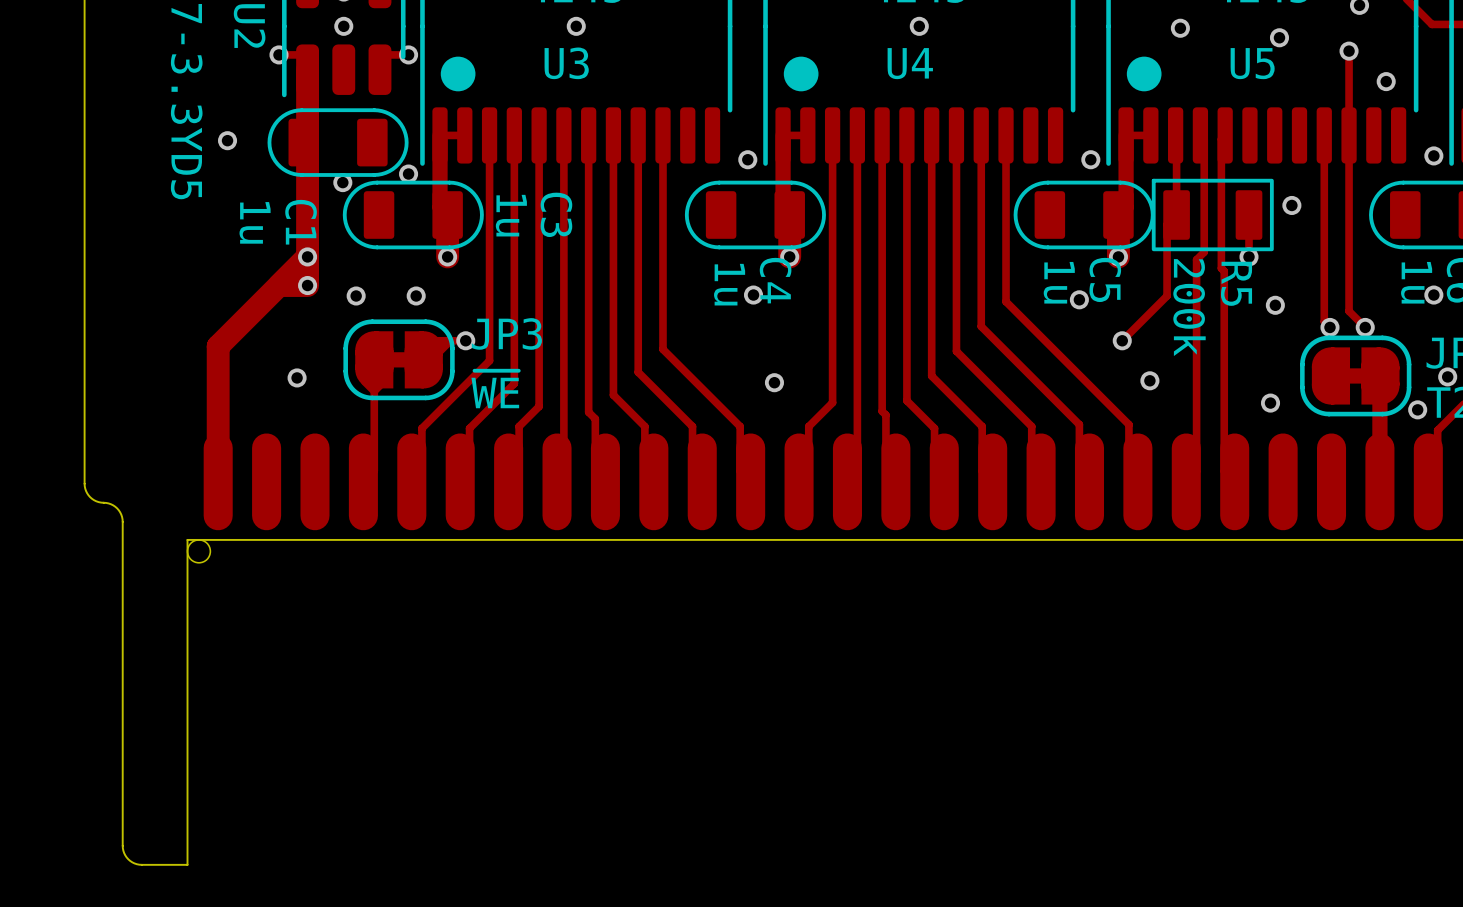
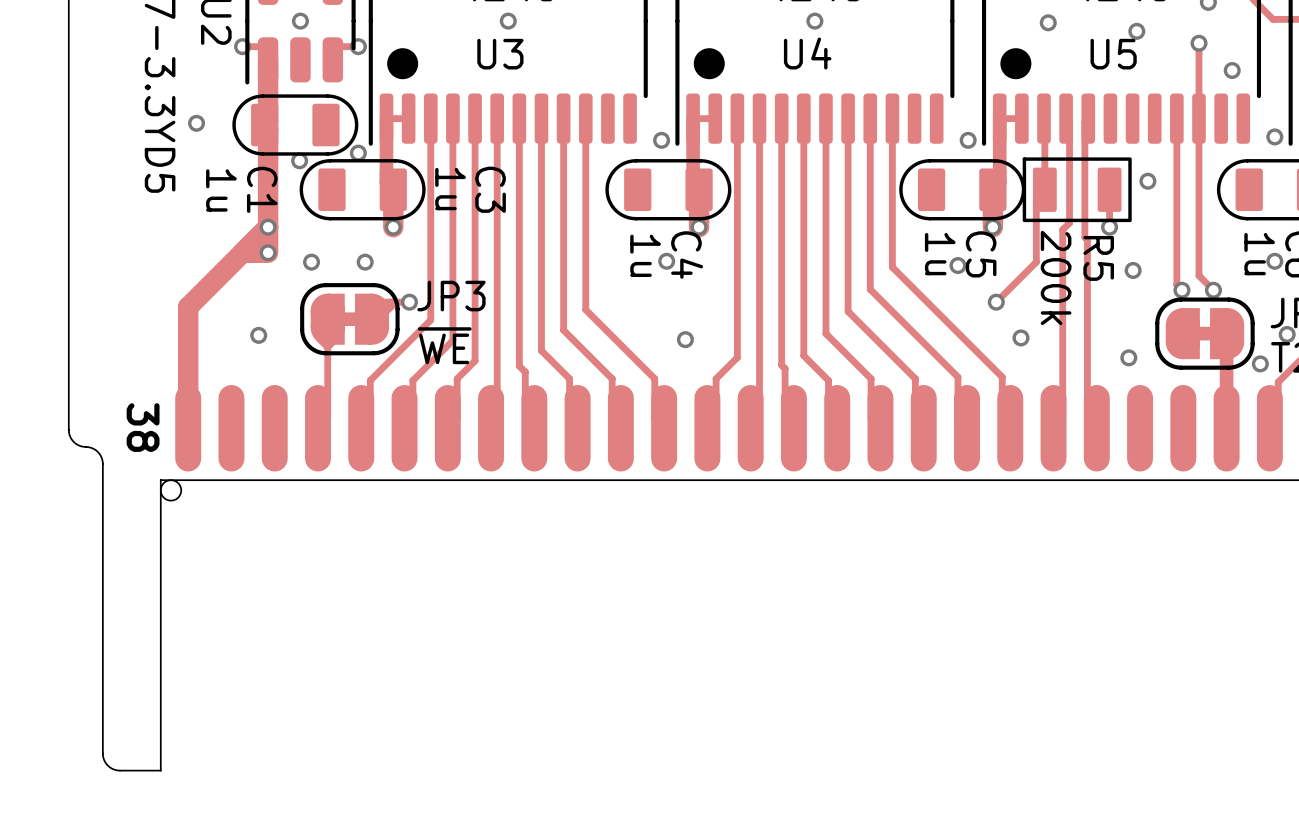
text: none -> 38 (143, 427)

